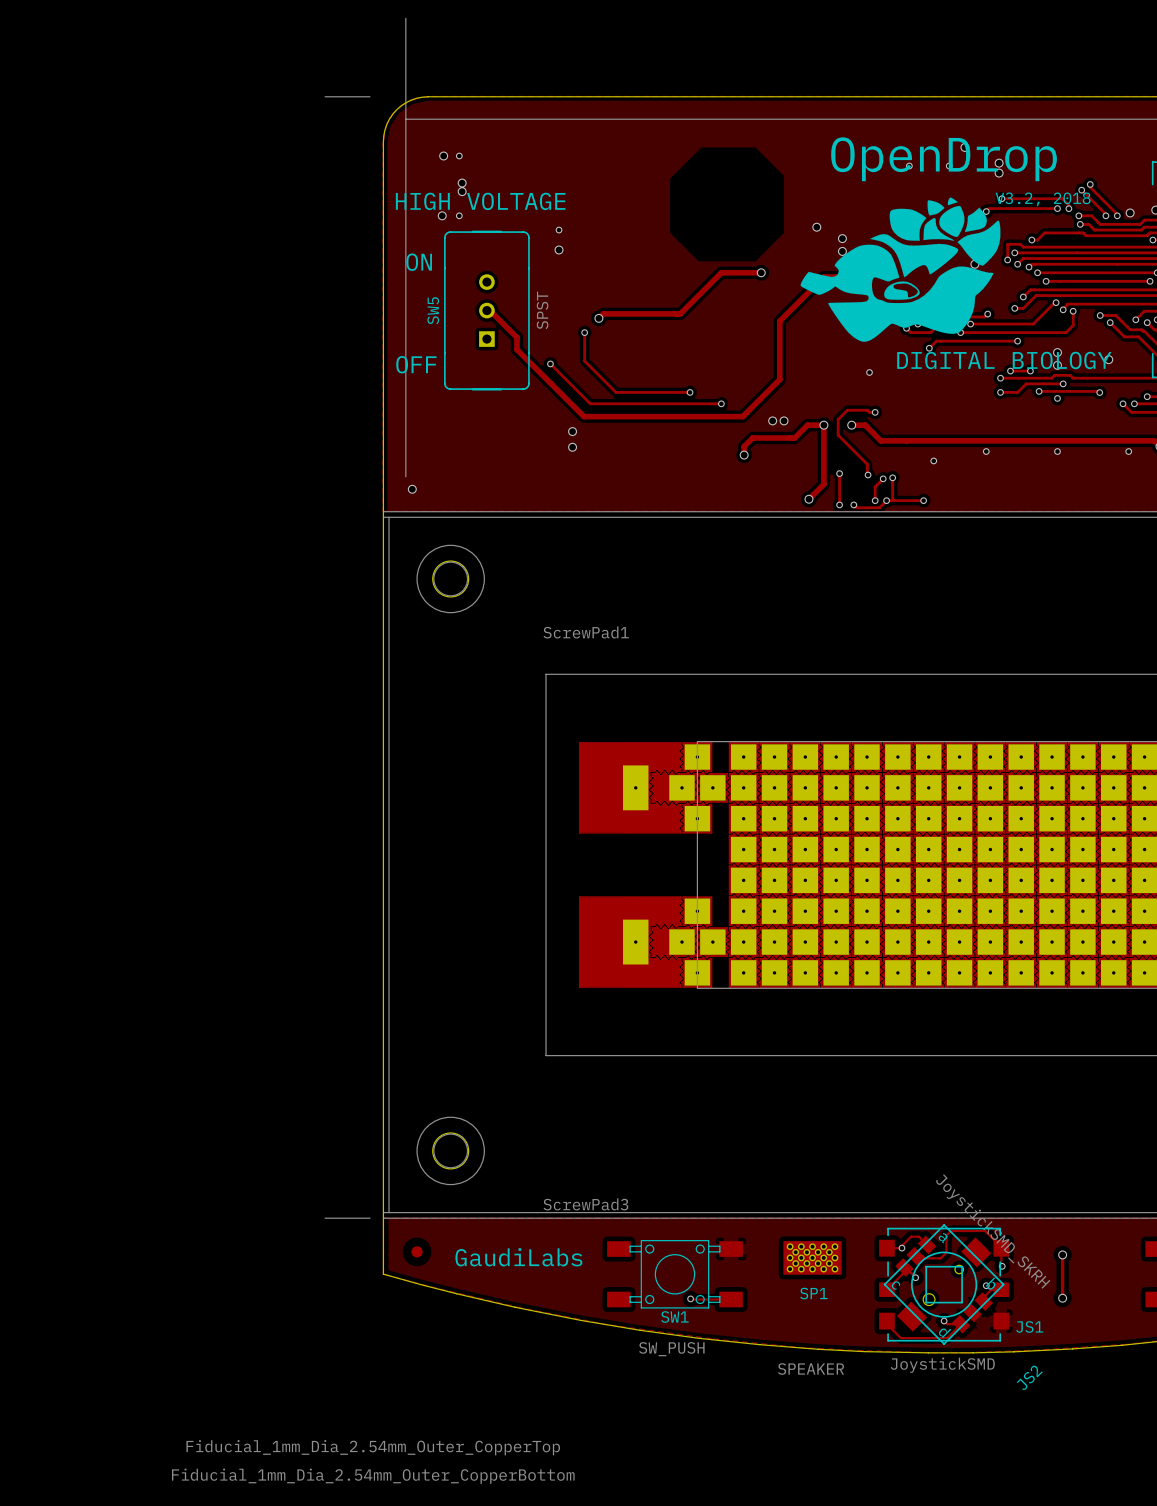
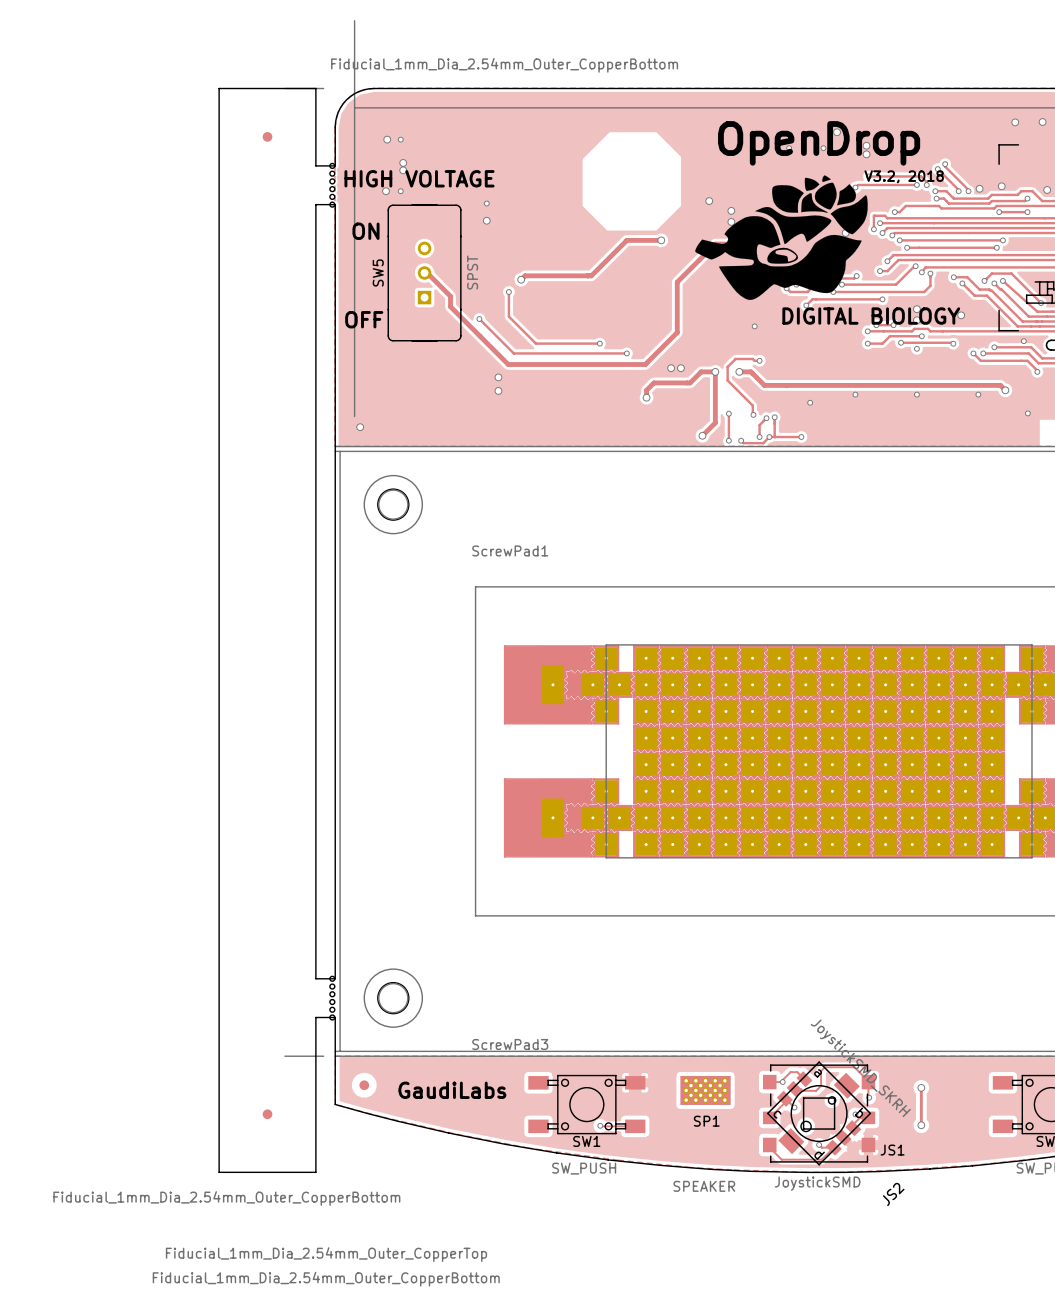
part: none -> Fiducial_1mm_Dia_2.54mm_Outer_CopperBottom (504, 65)
part: none -> (267, 136)
part: none -> (332, 165)
board edge: (383, 186) (383, 231) -> (335, 165) (315, 165) (315, 88) (219, 88) (219, 1172) (315, 1172) (315, 1017) (335, 1017)
part: none -> (332, 173)
part: none -> (332, 181)
part: none -> (332, 189)
part: none -> (332, 196)
part: none -> (332, 204)
part: none -> (332, 978)
board edge: (383, 1128) (383, 1173) -> (335, 978) (315, 978) (315, 204) (335, 204)
part: none -> (332, 986)
part: none -> (332, 994)
part: none -> (332, 1002)
part: none -> (332, 1009)
part: none -> (332, 1017)
part: none -> (267, 1114)
part: none -> Fiducial_1mm_Dia_2.54mm_Outer_CopperBottom (226, 1198)

